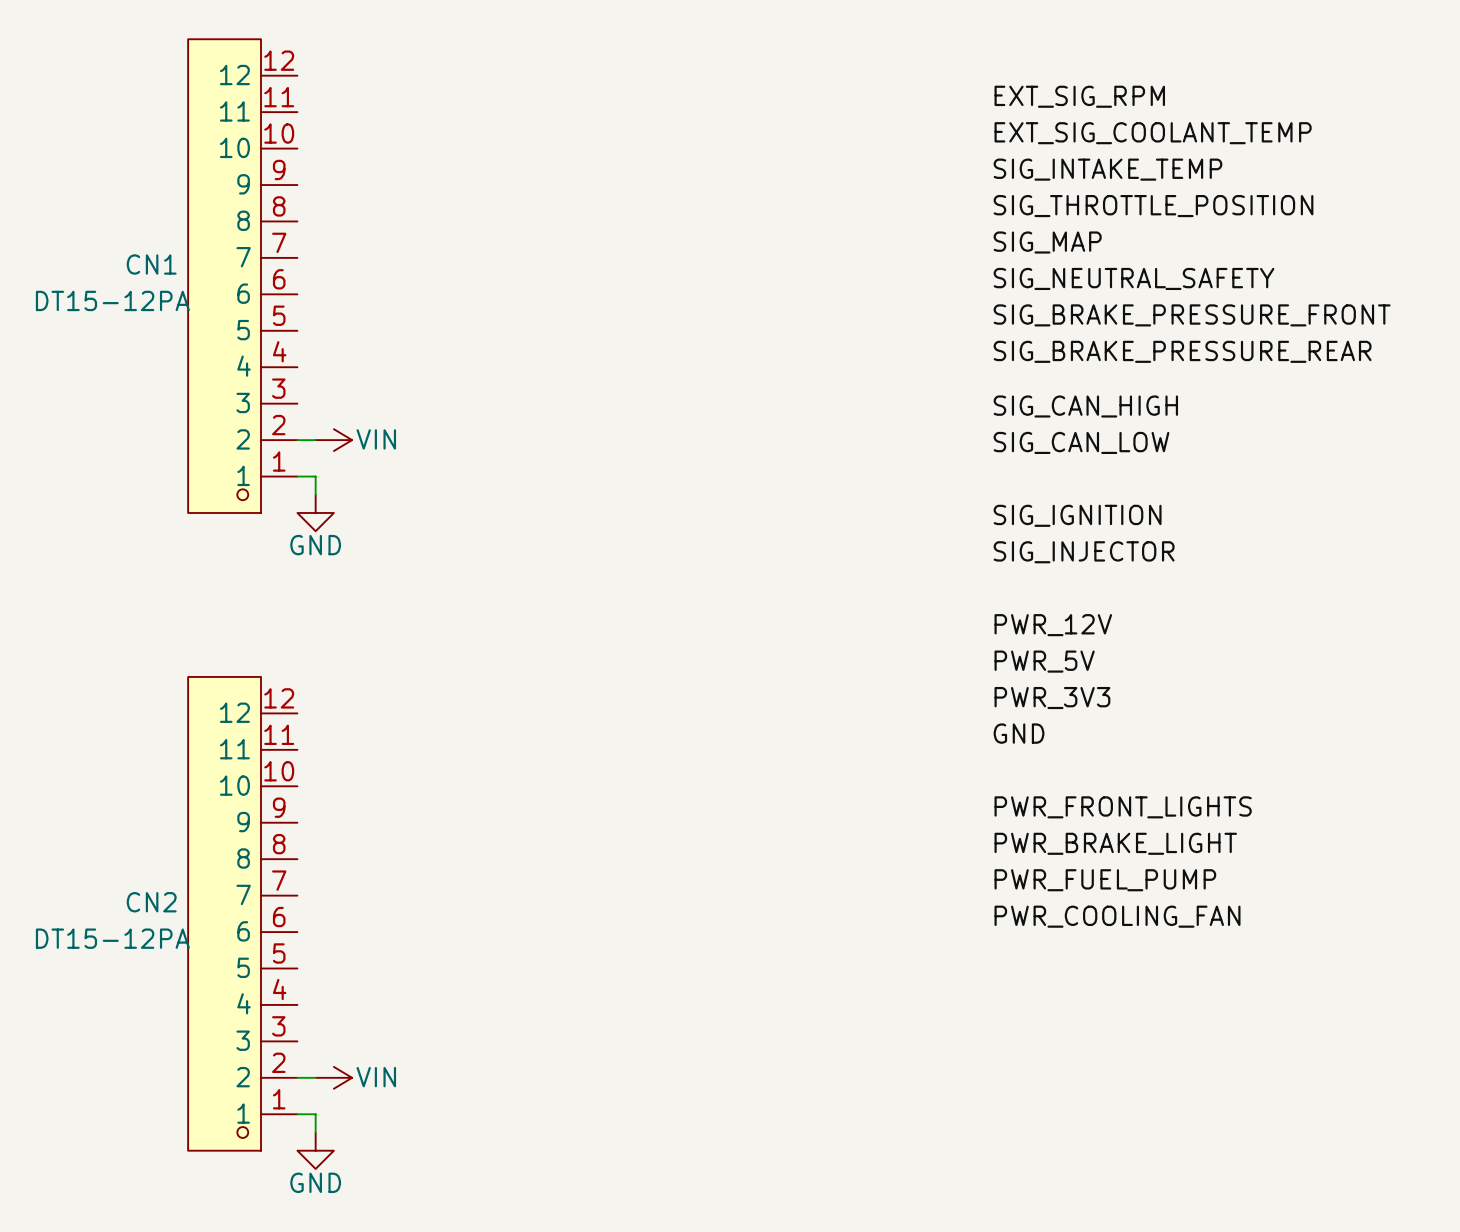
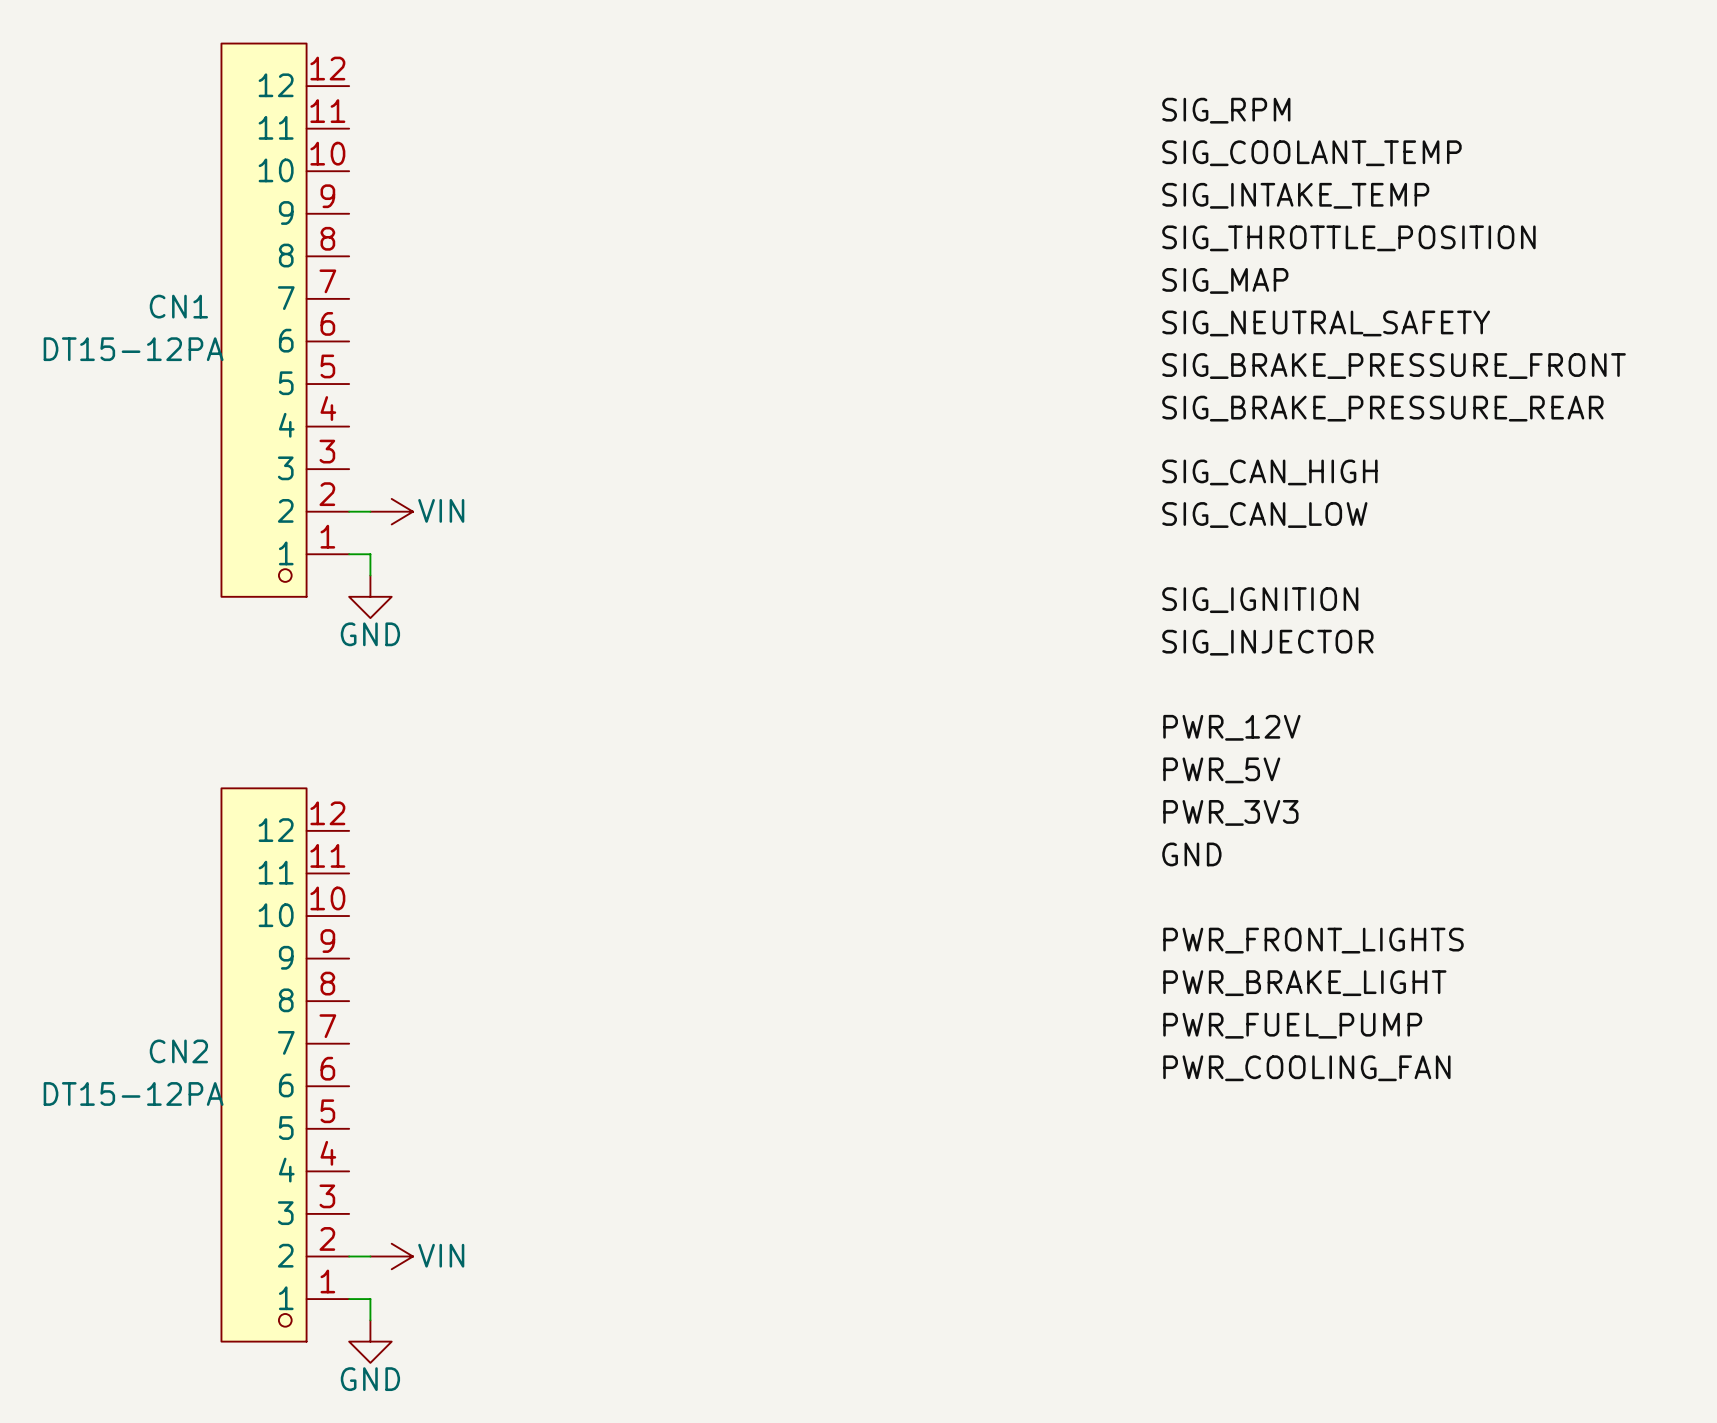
label: EXT_SIG_RPM (1079, 96) -> SIG_RPM (1226, 110)
label: EXT_SIG_COOLANT_TEMP (1153, 133) -> SIG_COOLANT_TEMP (1311, 153)

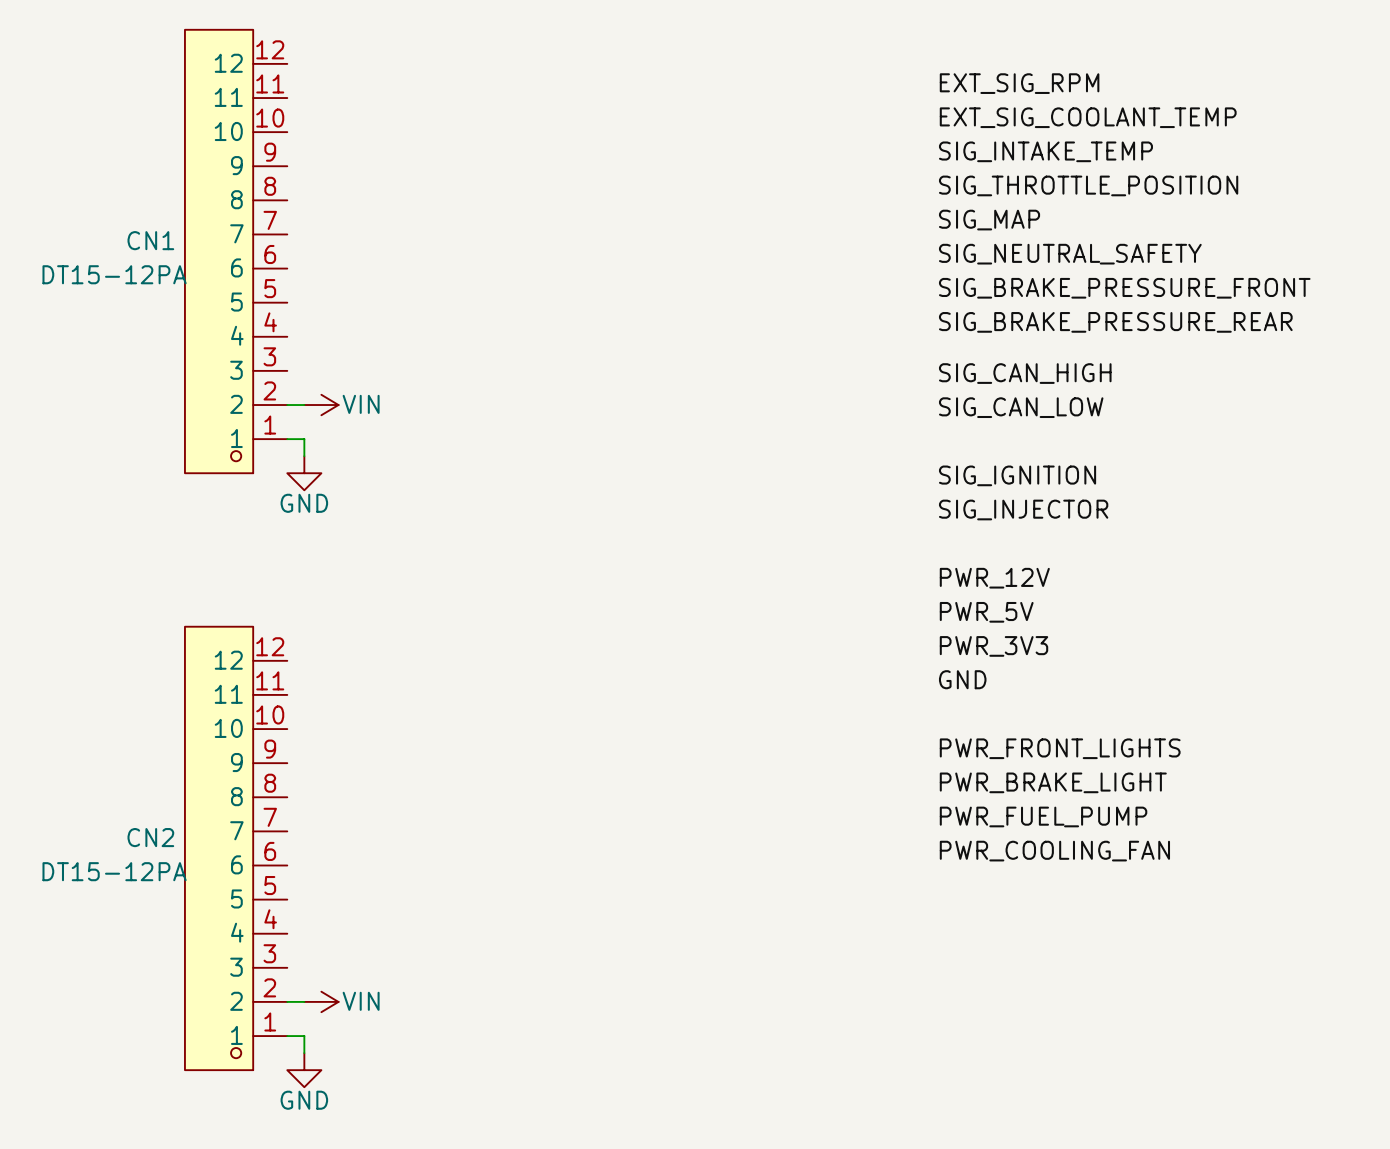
label: SIG_RPM (1226, 110) -> EXT_SIG_RPM (1019, 83)
label: SIG_COOLANT_TEMP (1311, 153) -> EXT_SIG_COOLANT_TEMP (1088, 117)

